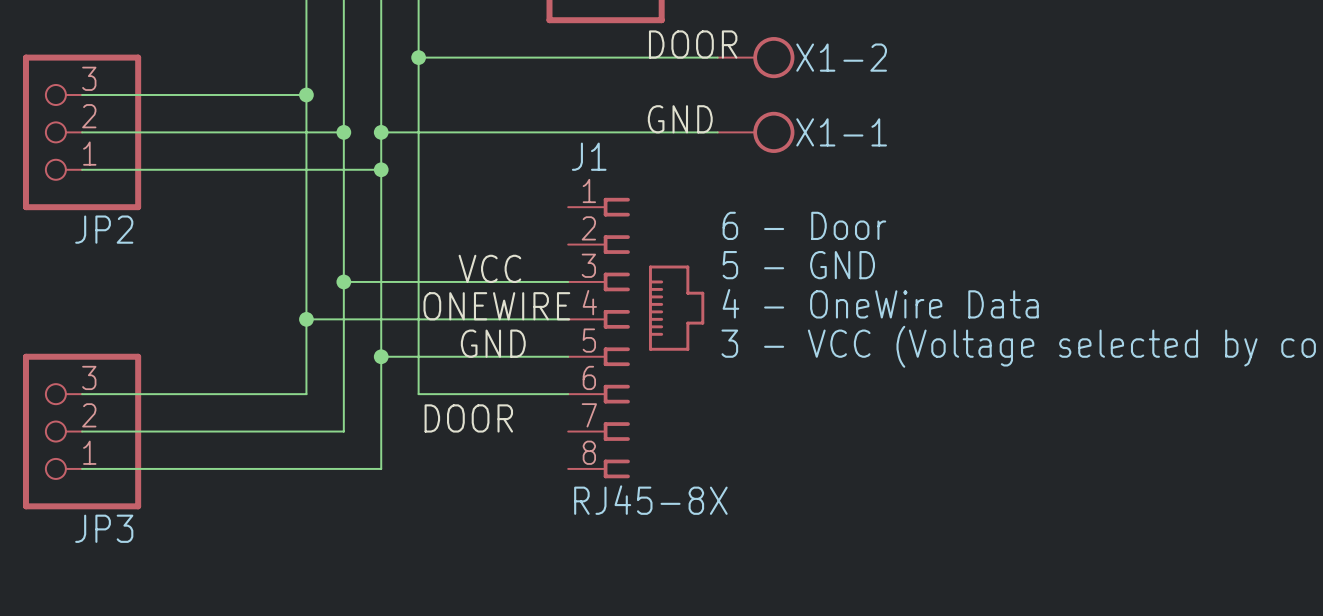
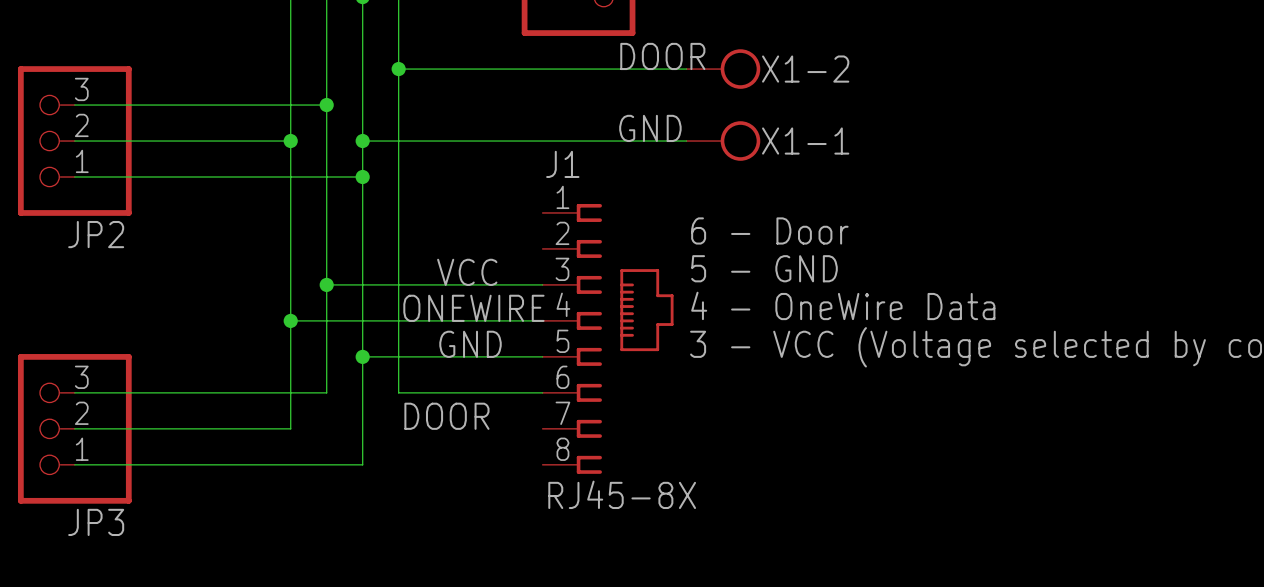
junction: (306, 94) -> none
junction: none -> (326, 105)
wire: (306, 132) (343, 132) -> (290, 105) (326, 105)
junction: none -> (290, 141)
junction: (343, 132) -> none
wire: (343, 394) (343, 431) (306, 431) -> (326, 392) (290, 392) (290, 428)

